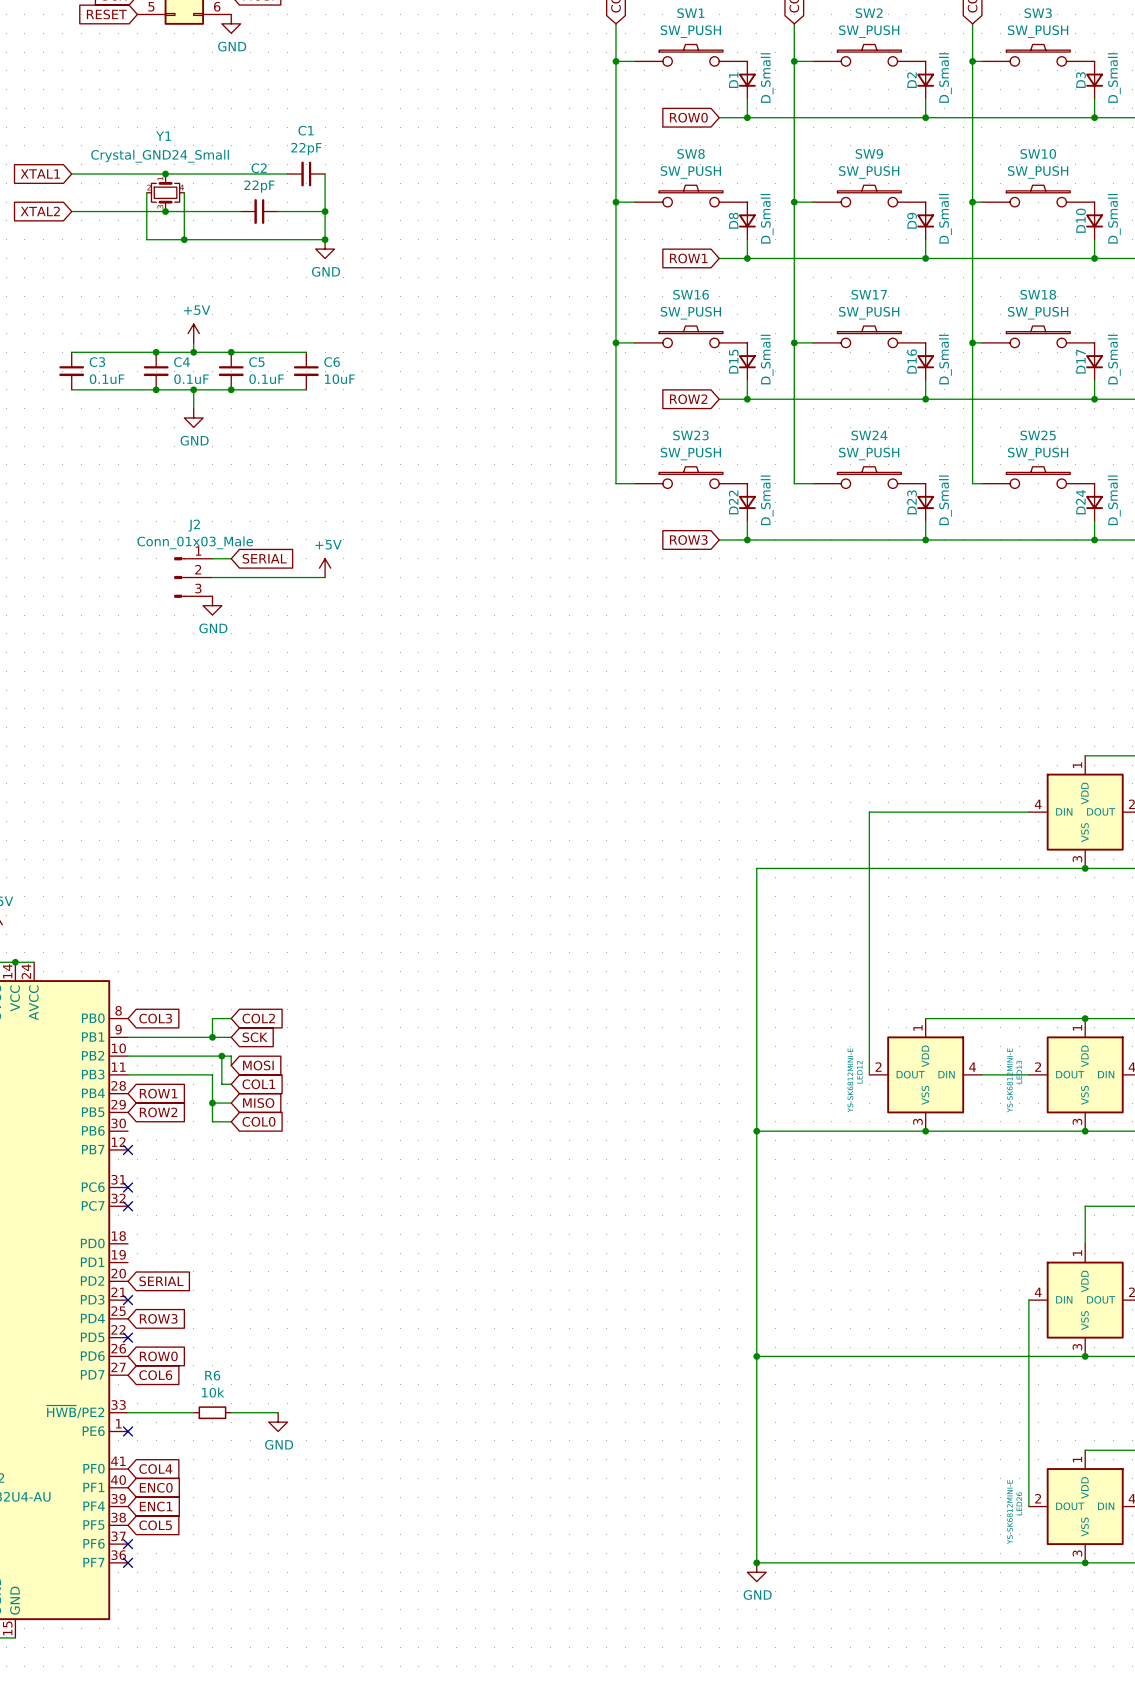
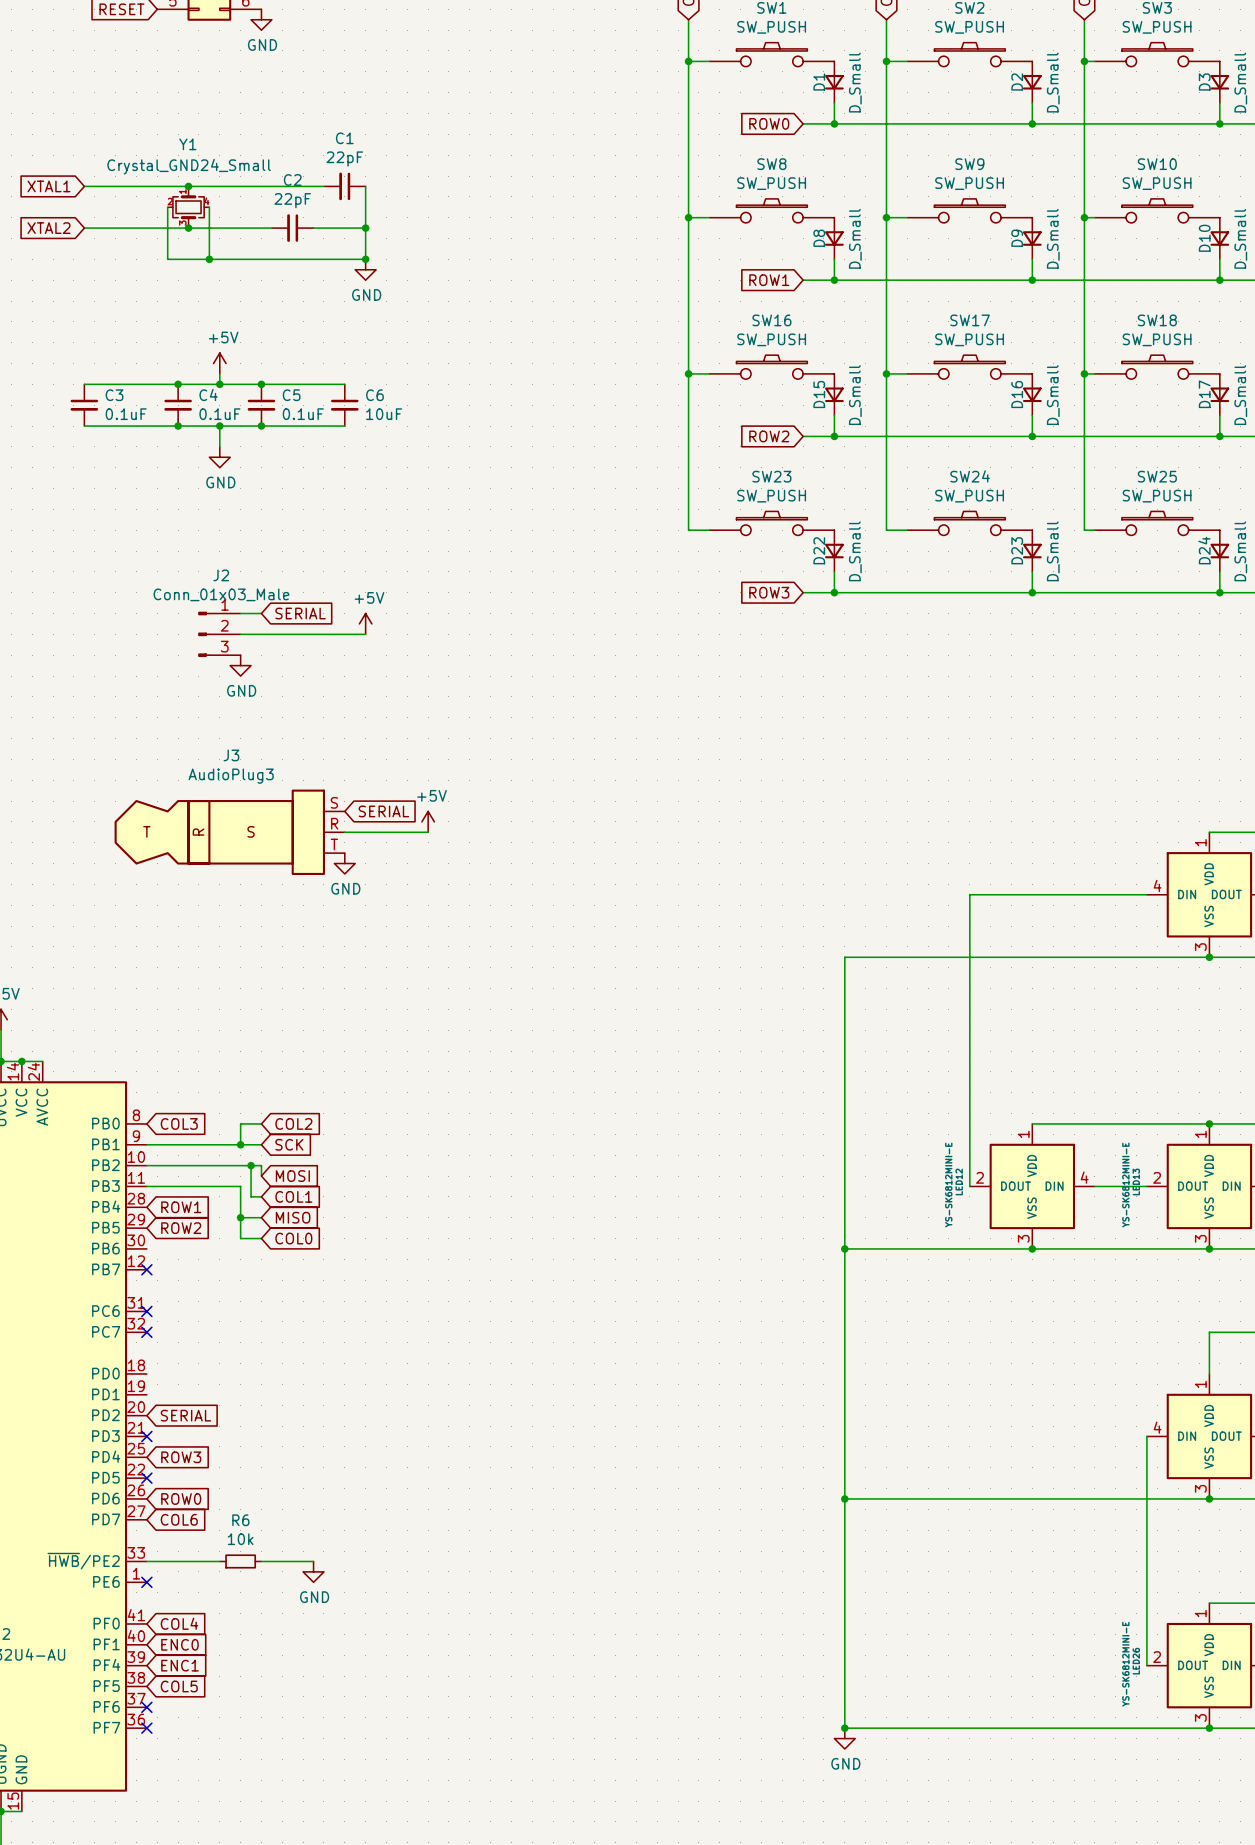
global label: none -> SERIAL (383, 811)
power symbol: none -> +5V (428, 821)
J3: none -> AudioPlug3 (229, 832)
wire: none -> (344, 832) (428, 832)
power symbol: none -> GND (344, 863)

